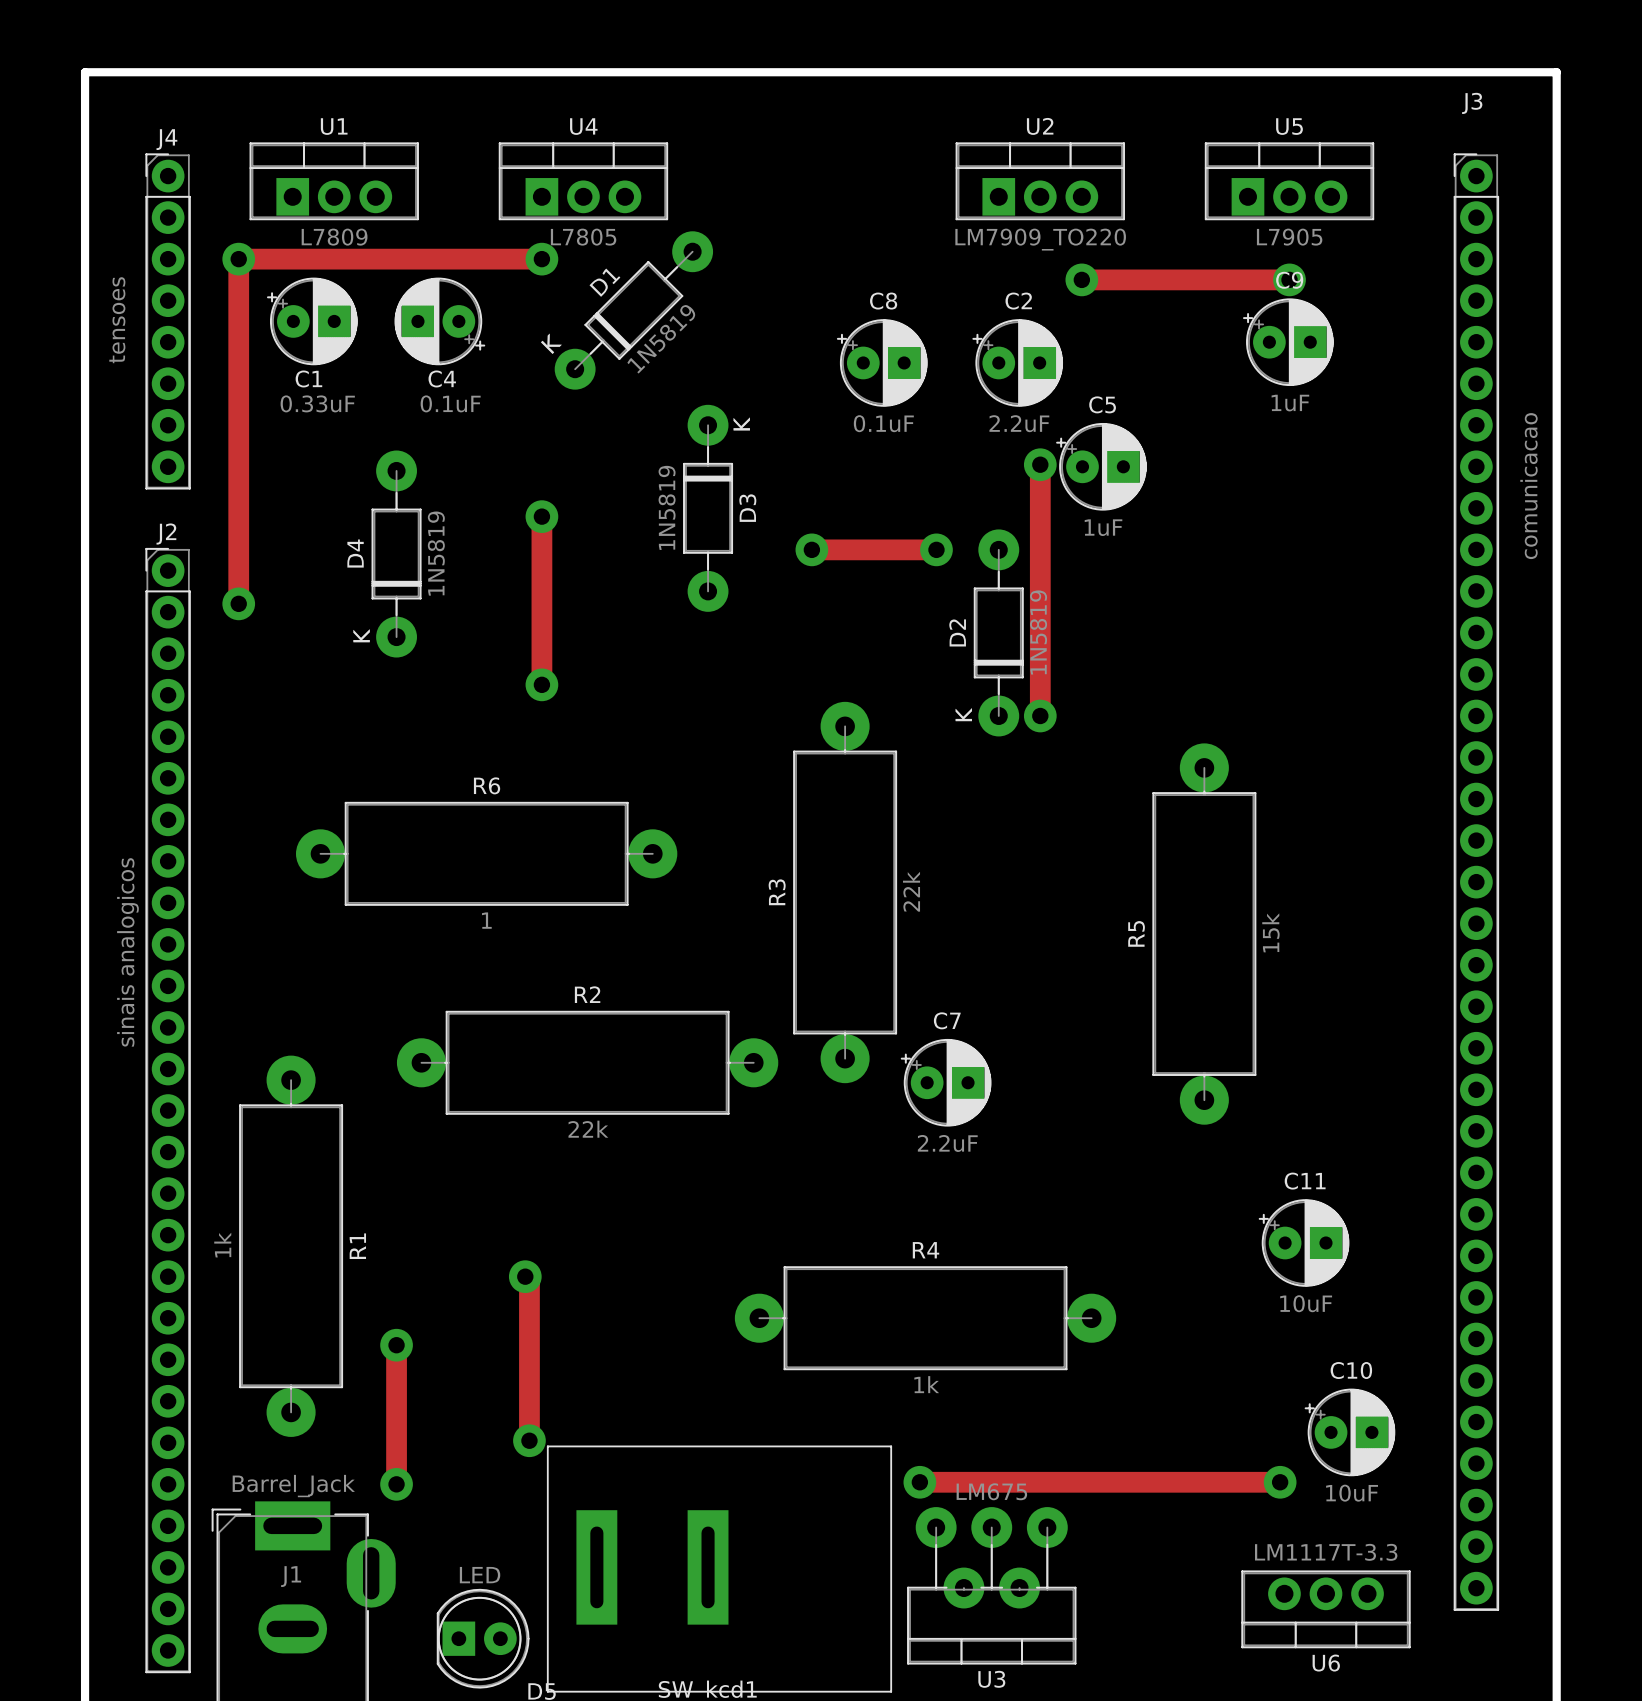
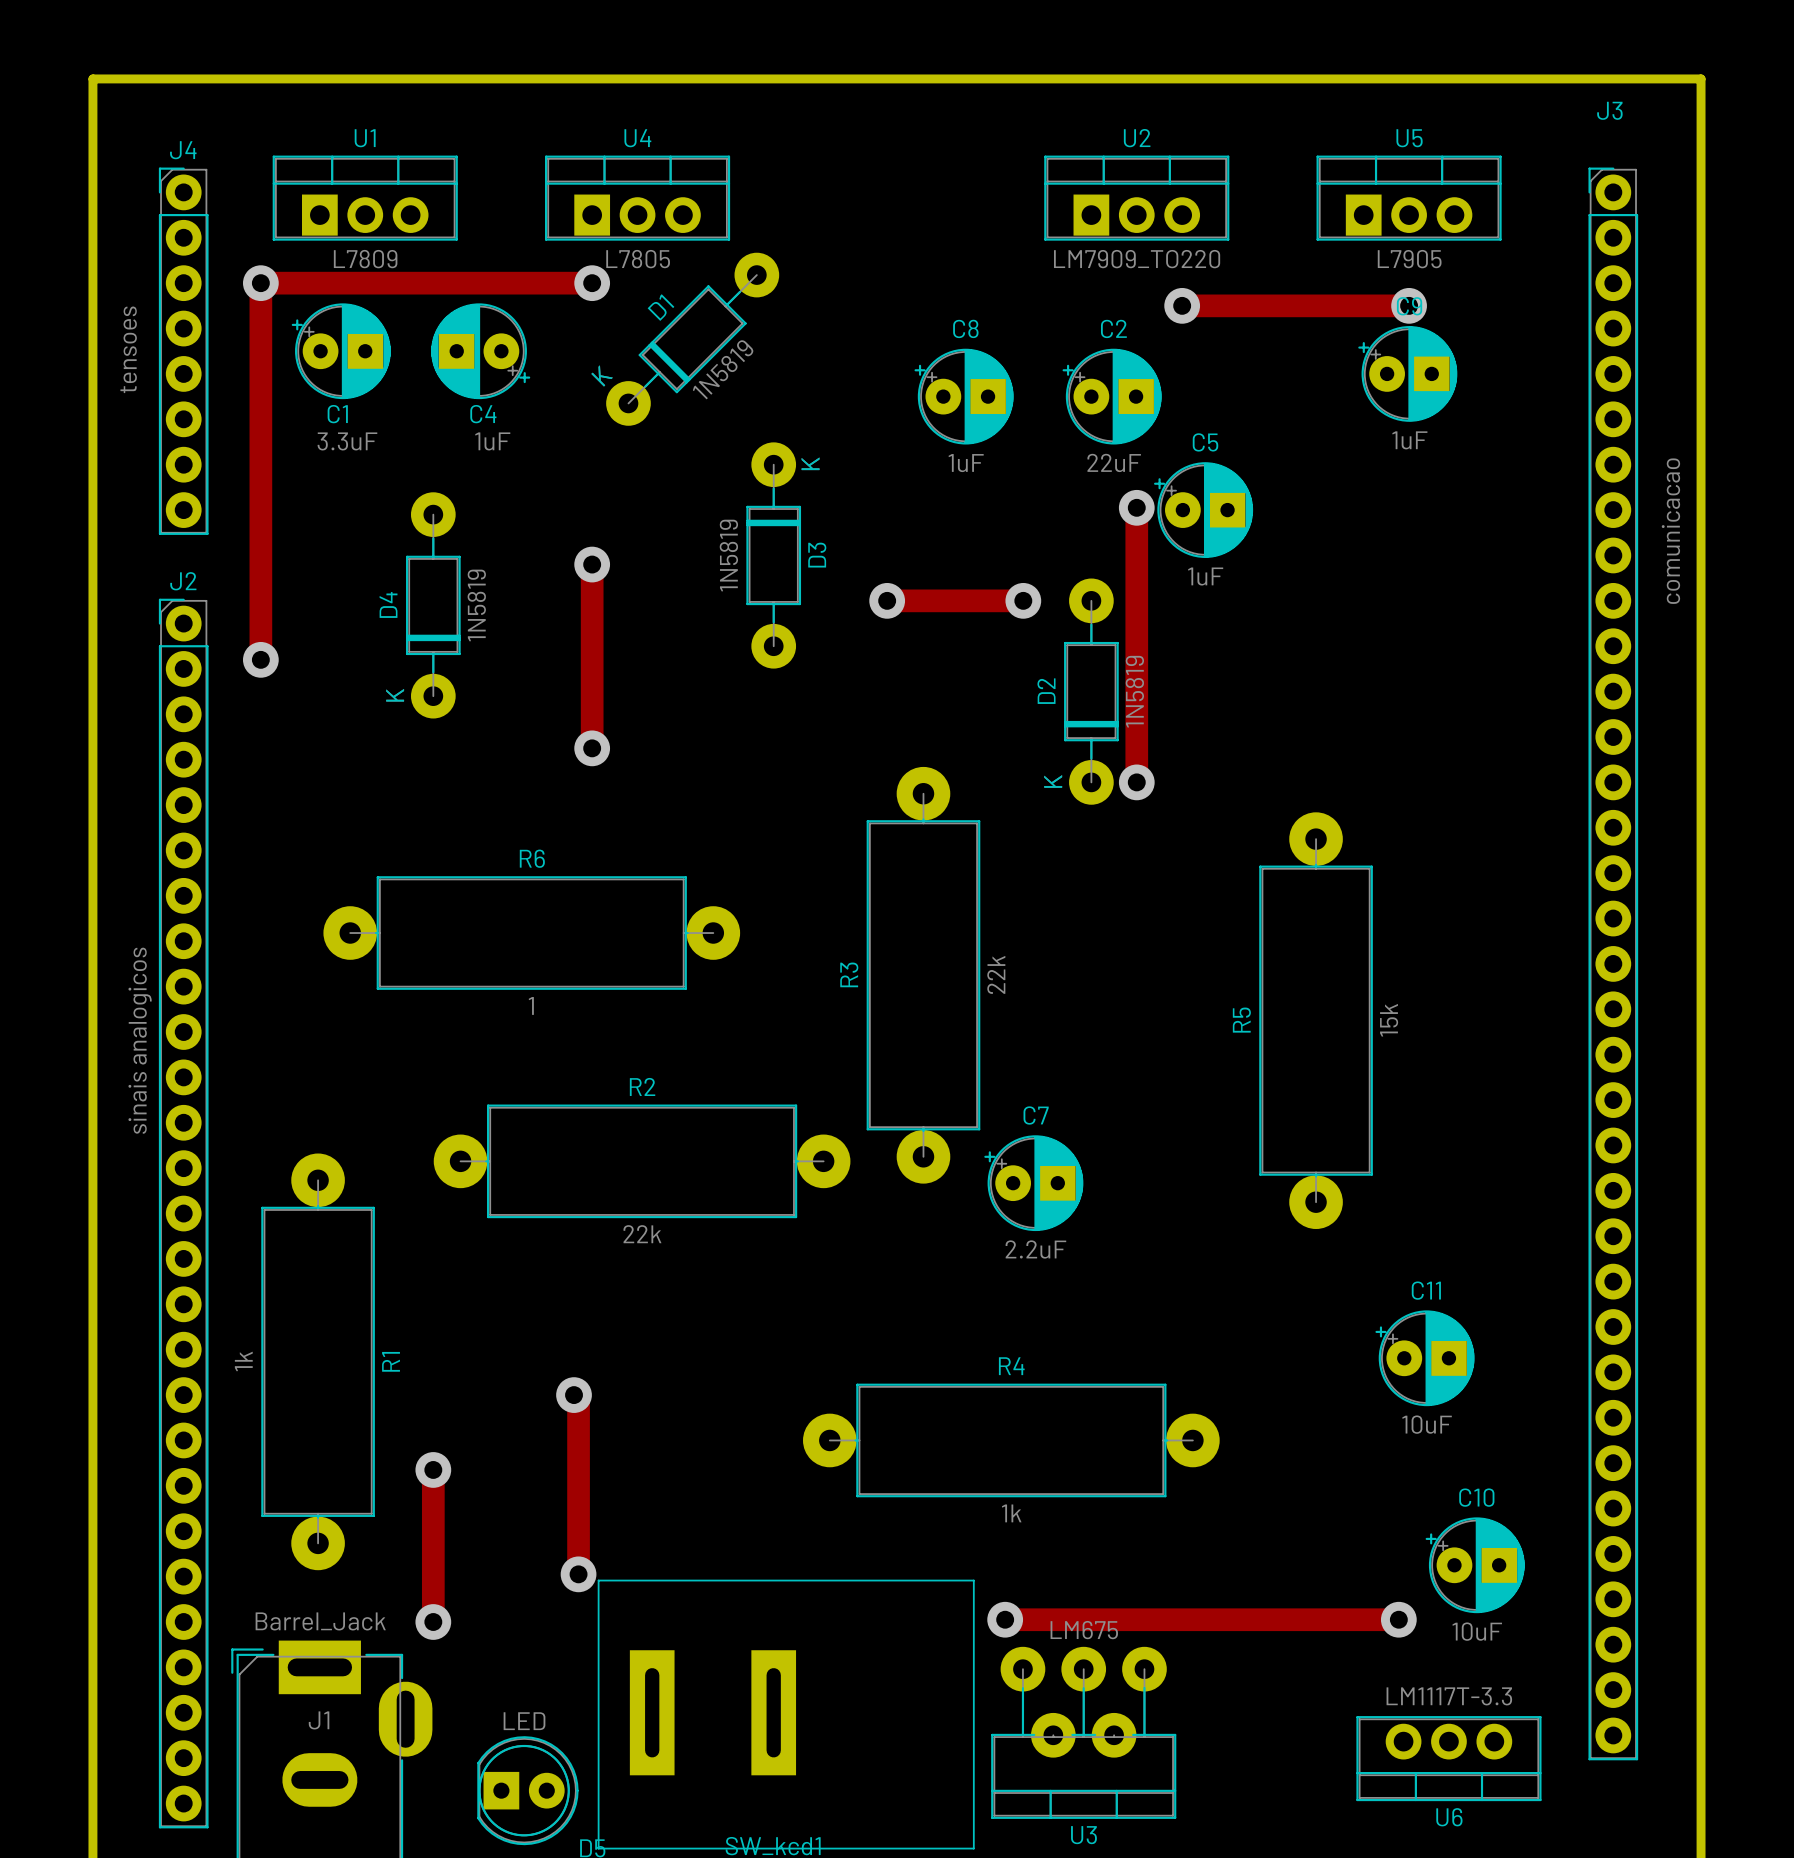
C1 value: 0.33uF (317, 403) -> 3.3uF (347, 441)
C4 value: 0.1uF (450, 403) -> 1uF (492, 441)
C8 value: 0.1uF (883, 423) -> 1uF (966, 463)
C2 value: 2.2uF (1019, 423) -> 22uF (1114, 462)

